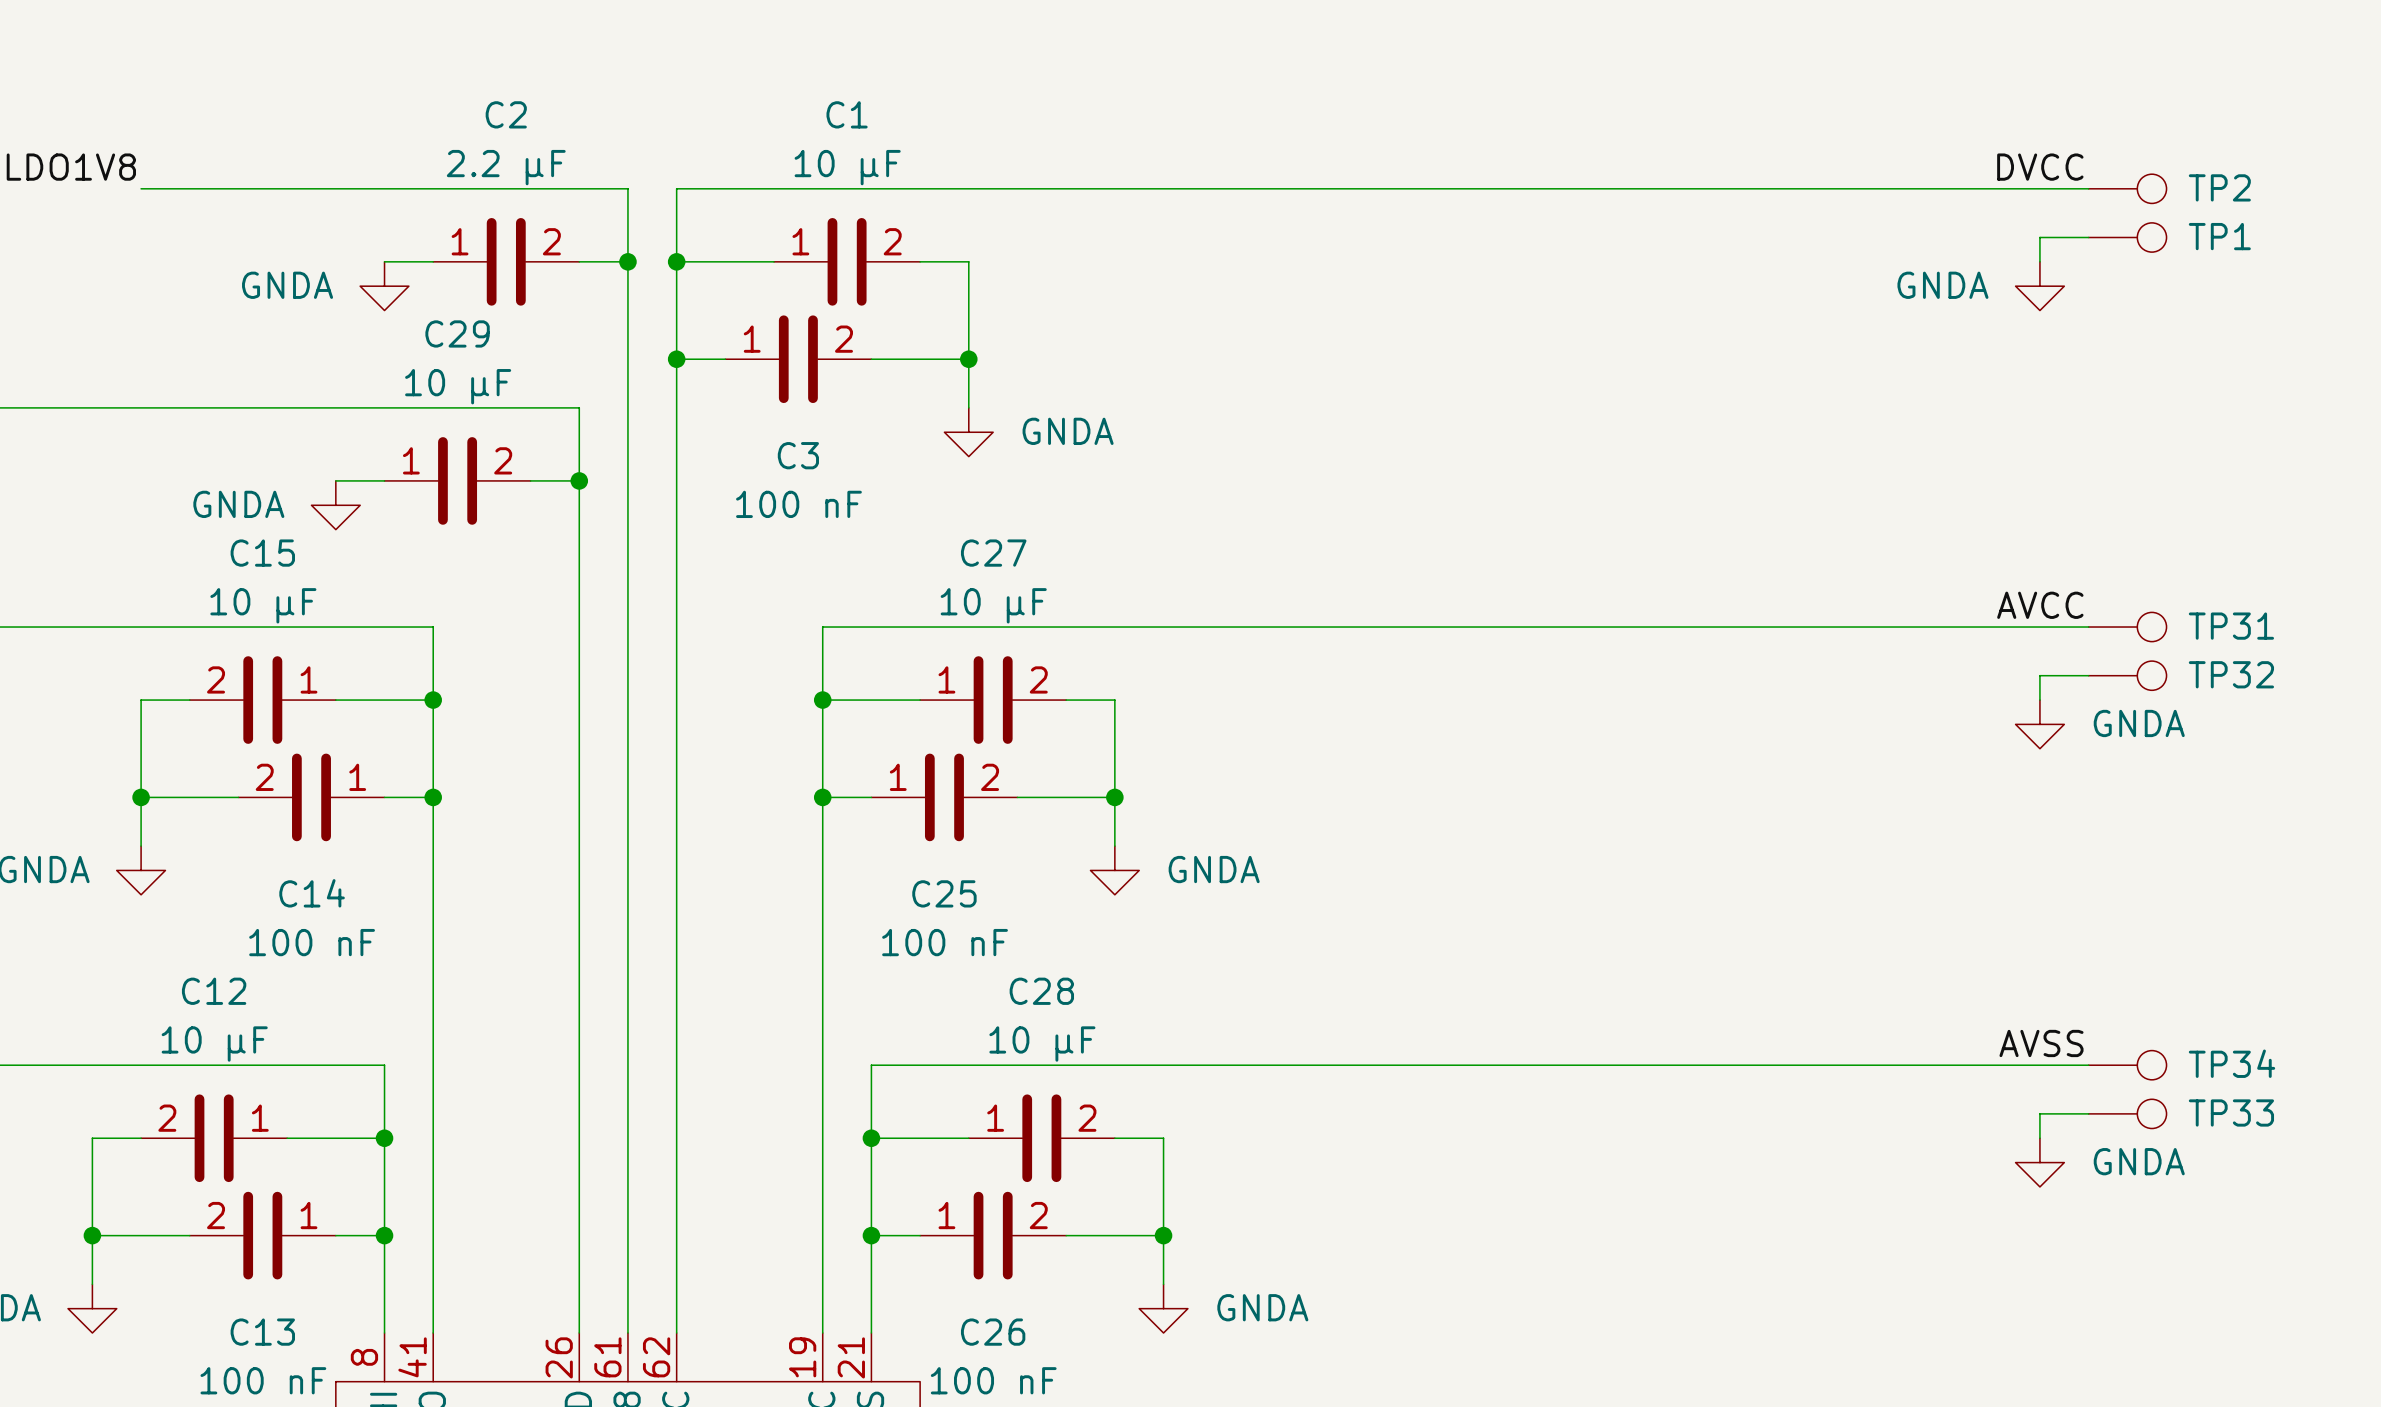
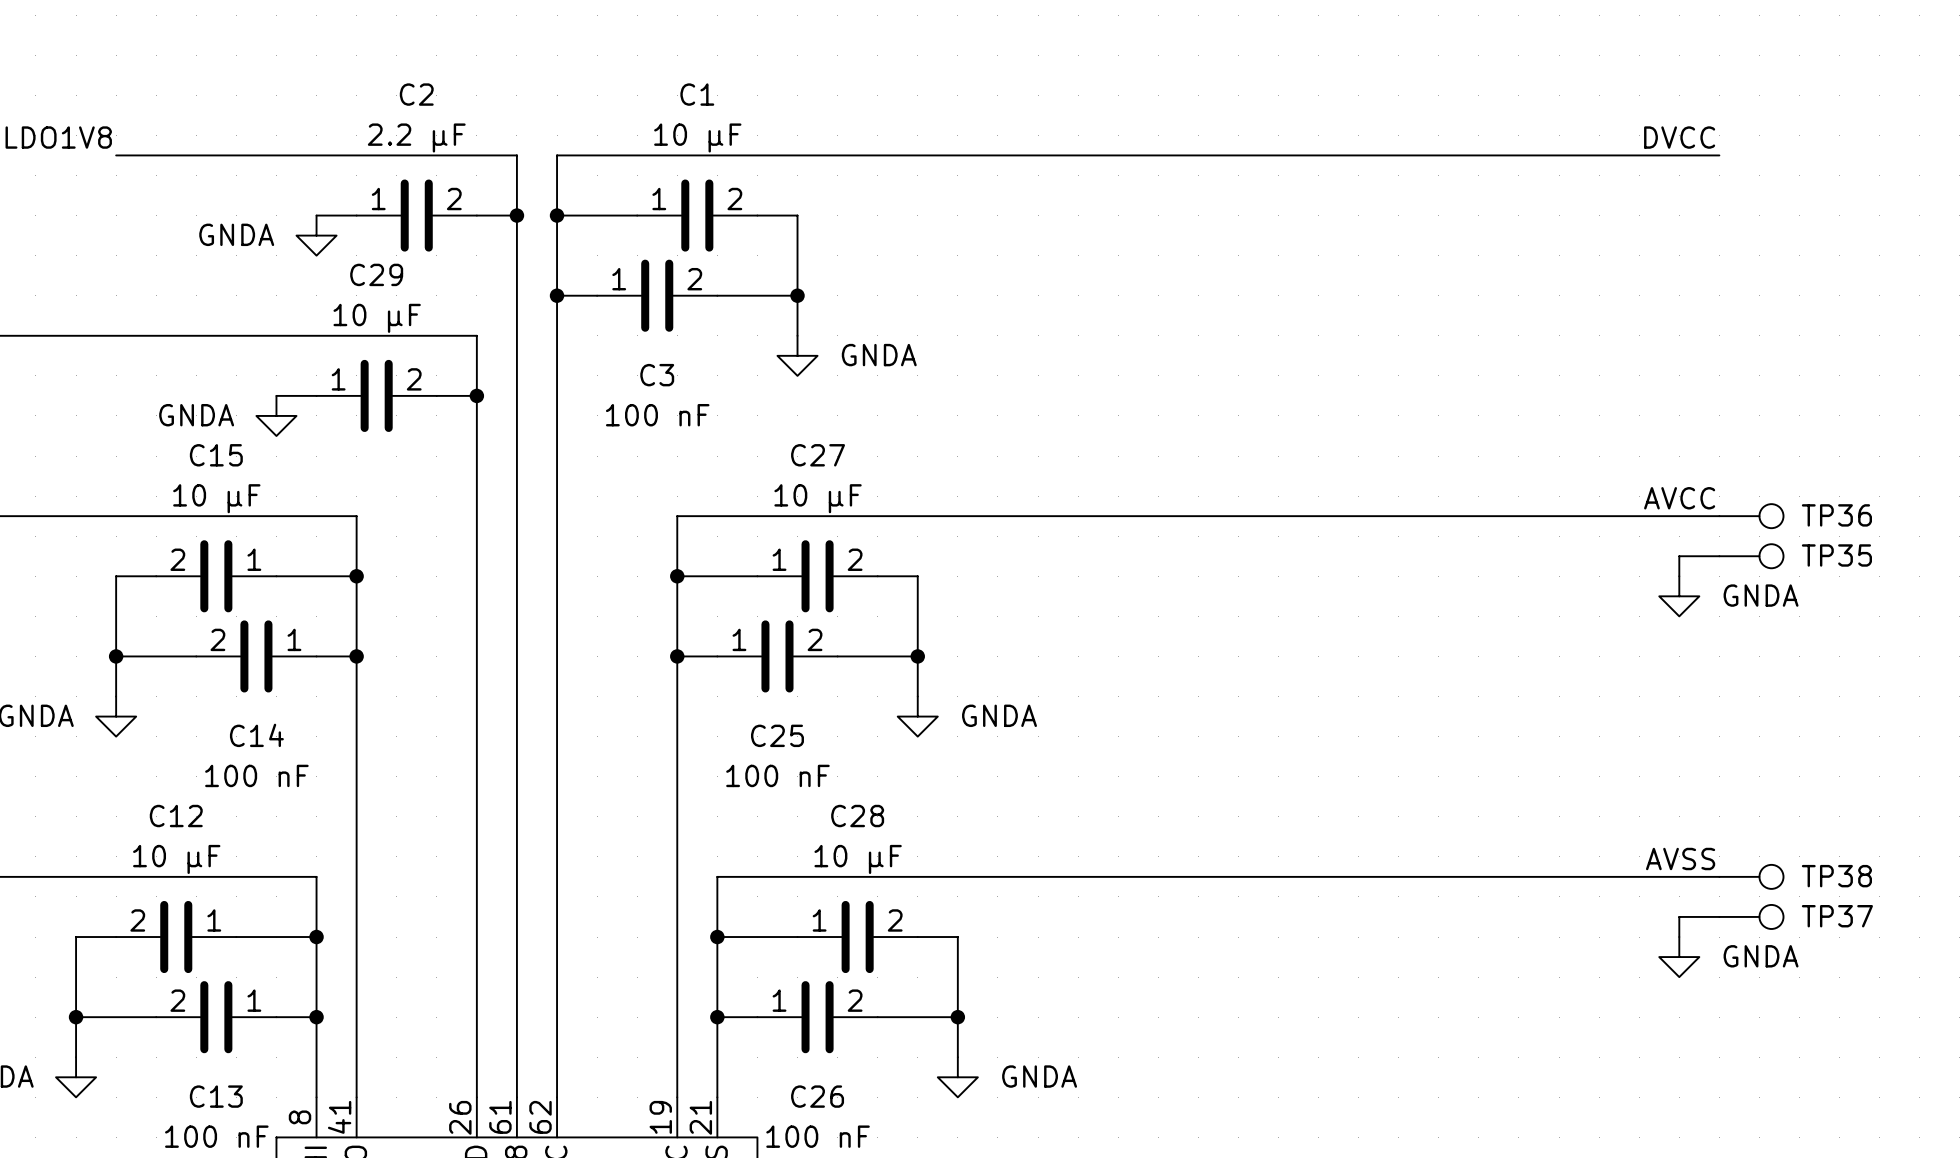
TP2: (2127, 188) -> none
wire: (2088, 237) (2039, 237) (2039, 261) -> none
TP1: (2127, 237) -> none
power symbol: GNDA (2039, 286) -> none
TP31 name: TP31 (2231, 626) -> TP36 (1836, 515)
TP32 name: TP32 (2231, 674) -> TP35 (1836, 555)
TP34 name: TP34 (2231, 1063) -> TP38 (1836, 876)
TP33 name: TP33 (2231, 1112) -> TP37 (1837, 916)

